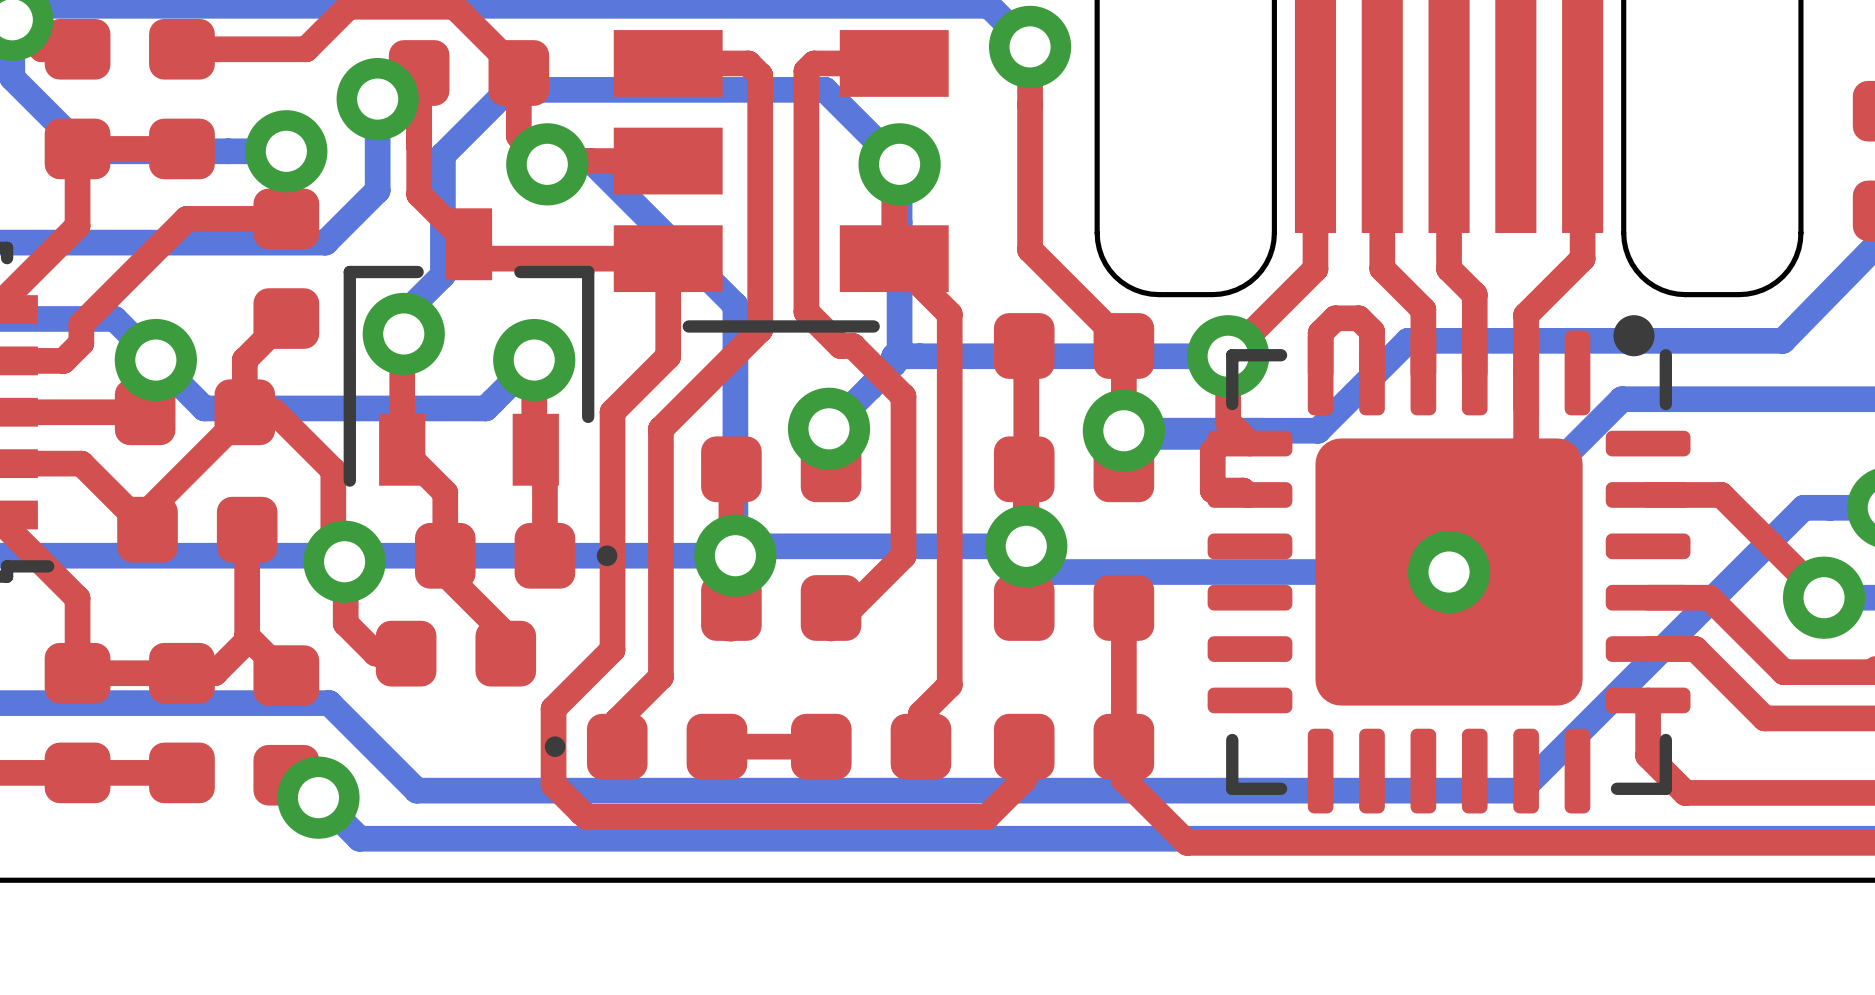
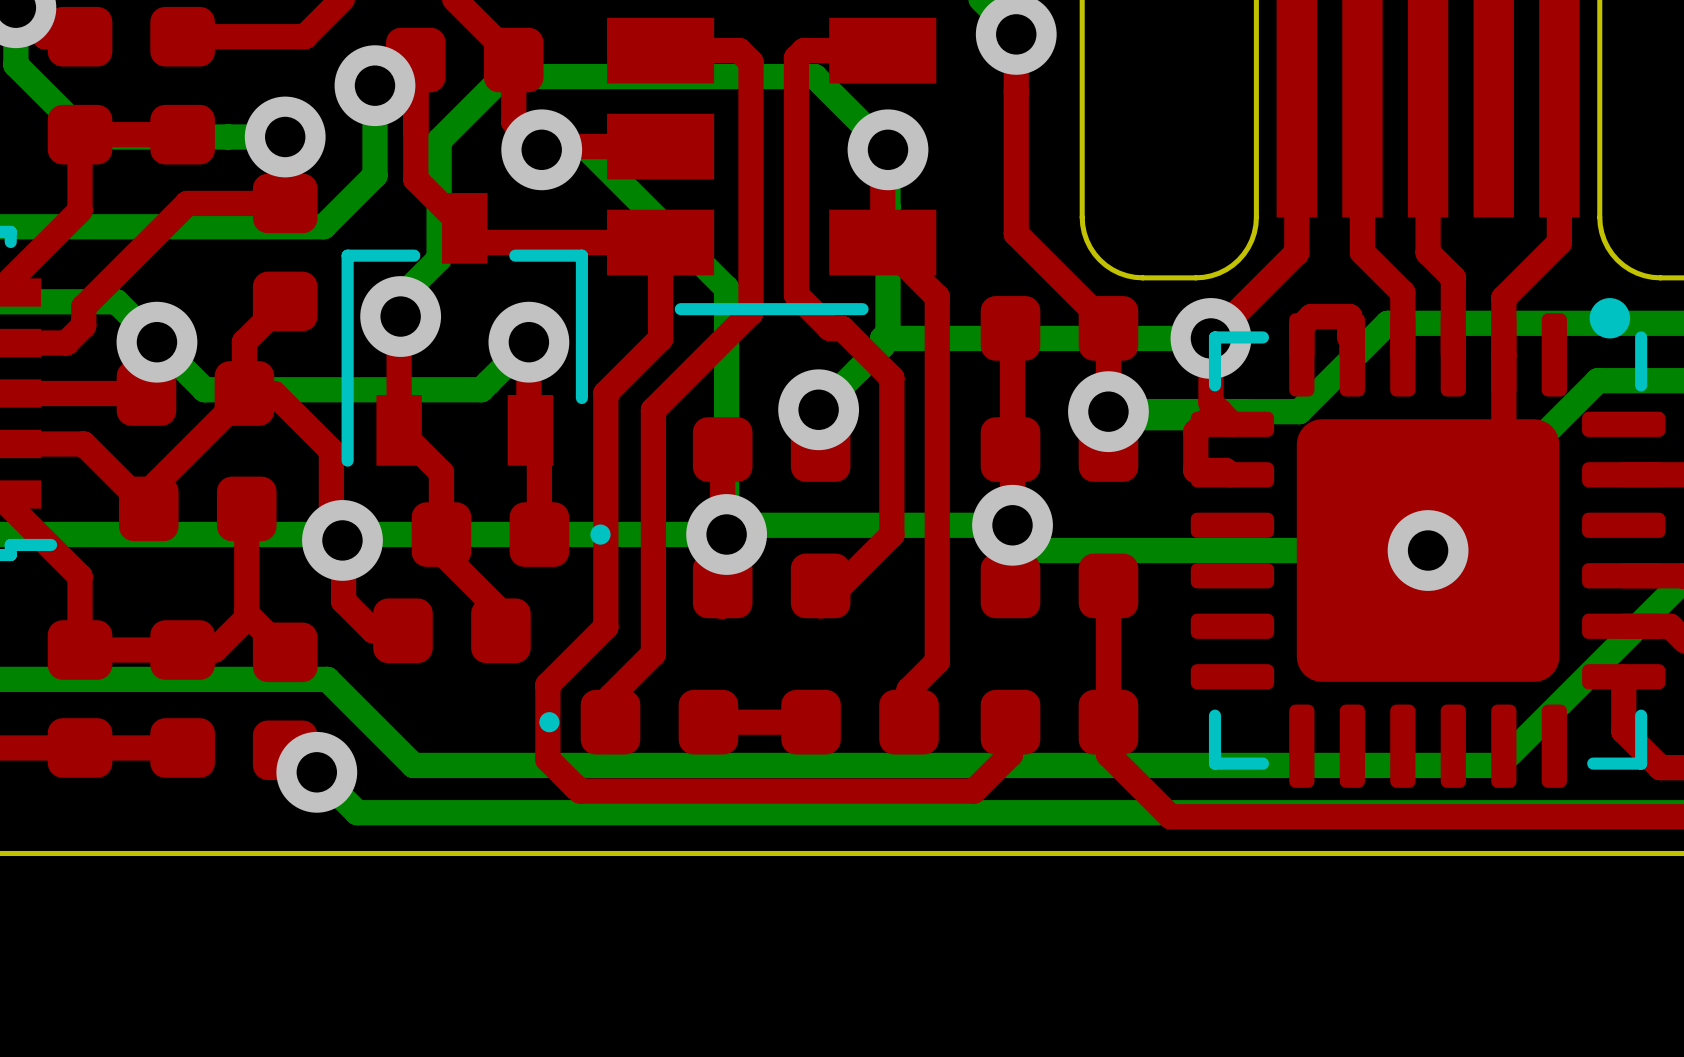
top track: (1320, 343) (1320, 333) (1335, 318) (1358, 318) (1371, 331) (1371, 356) -> (1301, 325) (1311, 316) (1349, 316) (1349, 336) (1352, 339)

